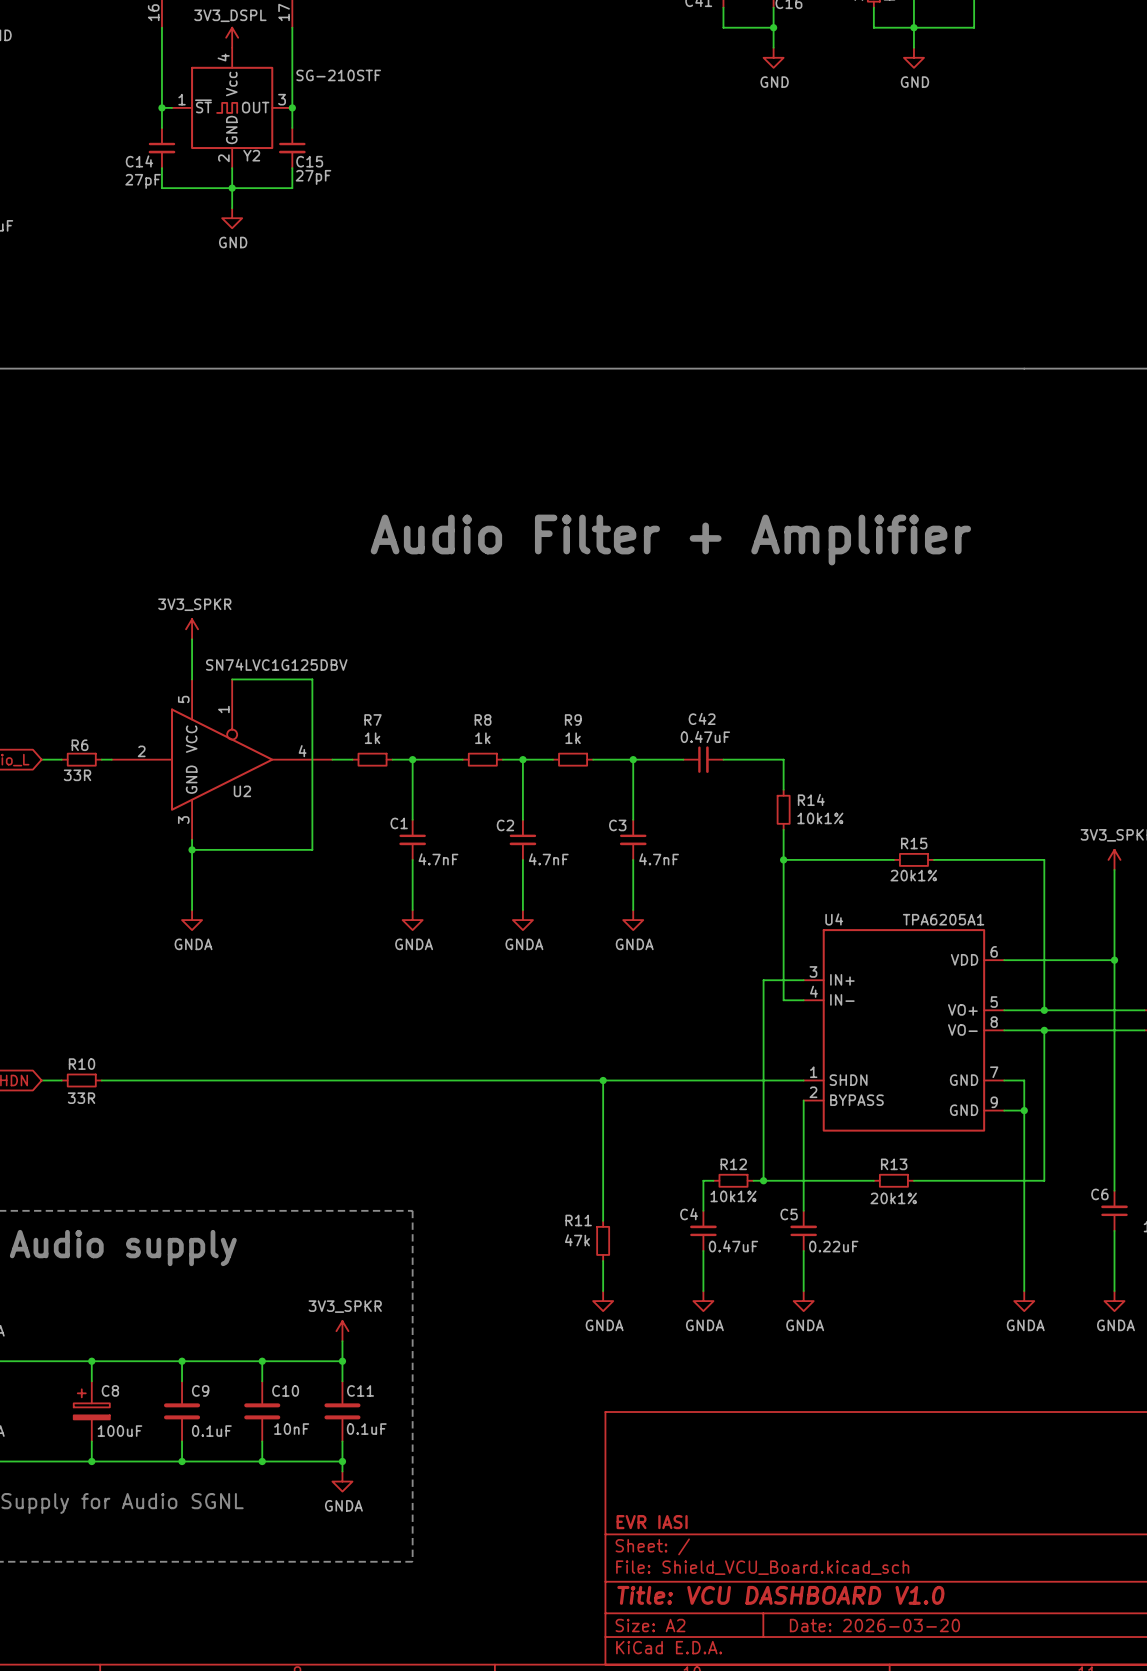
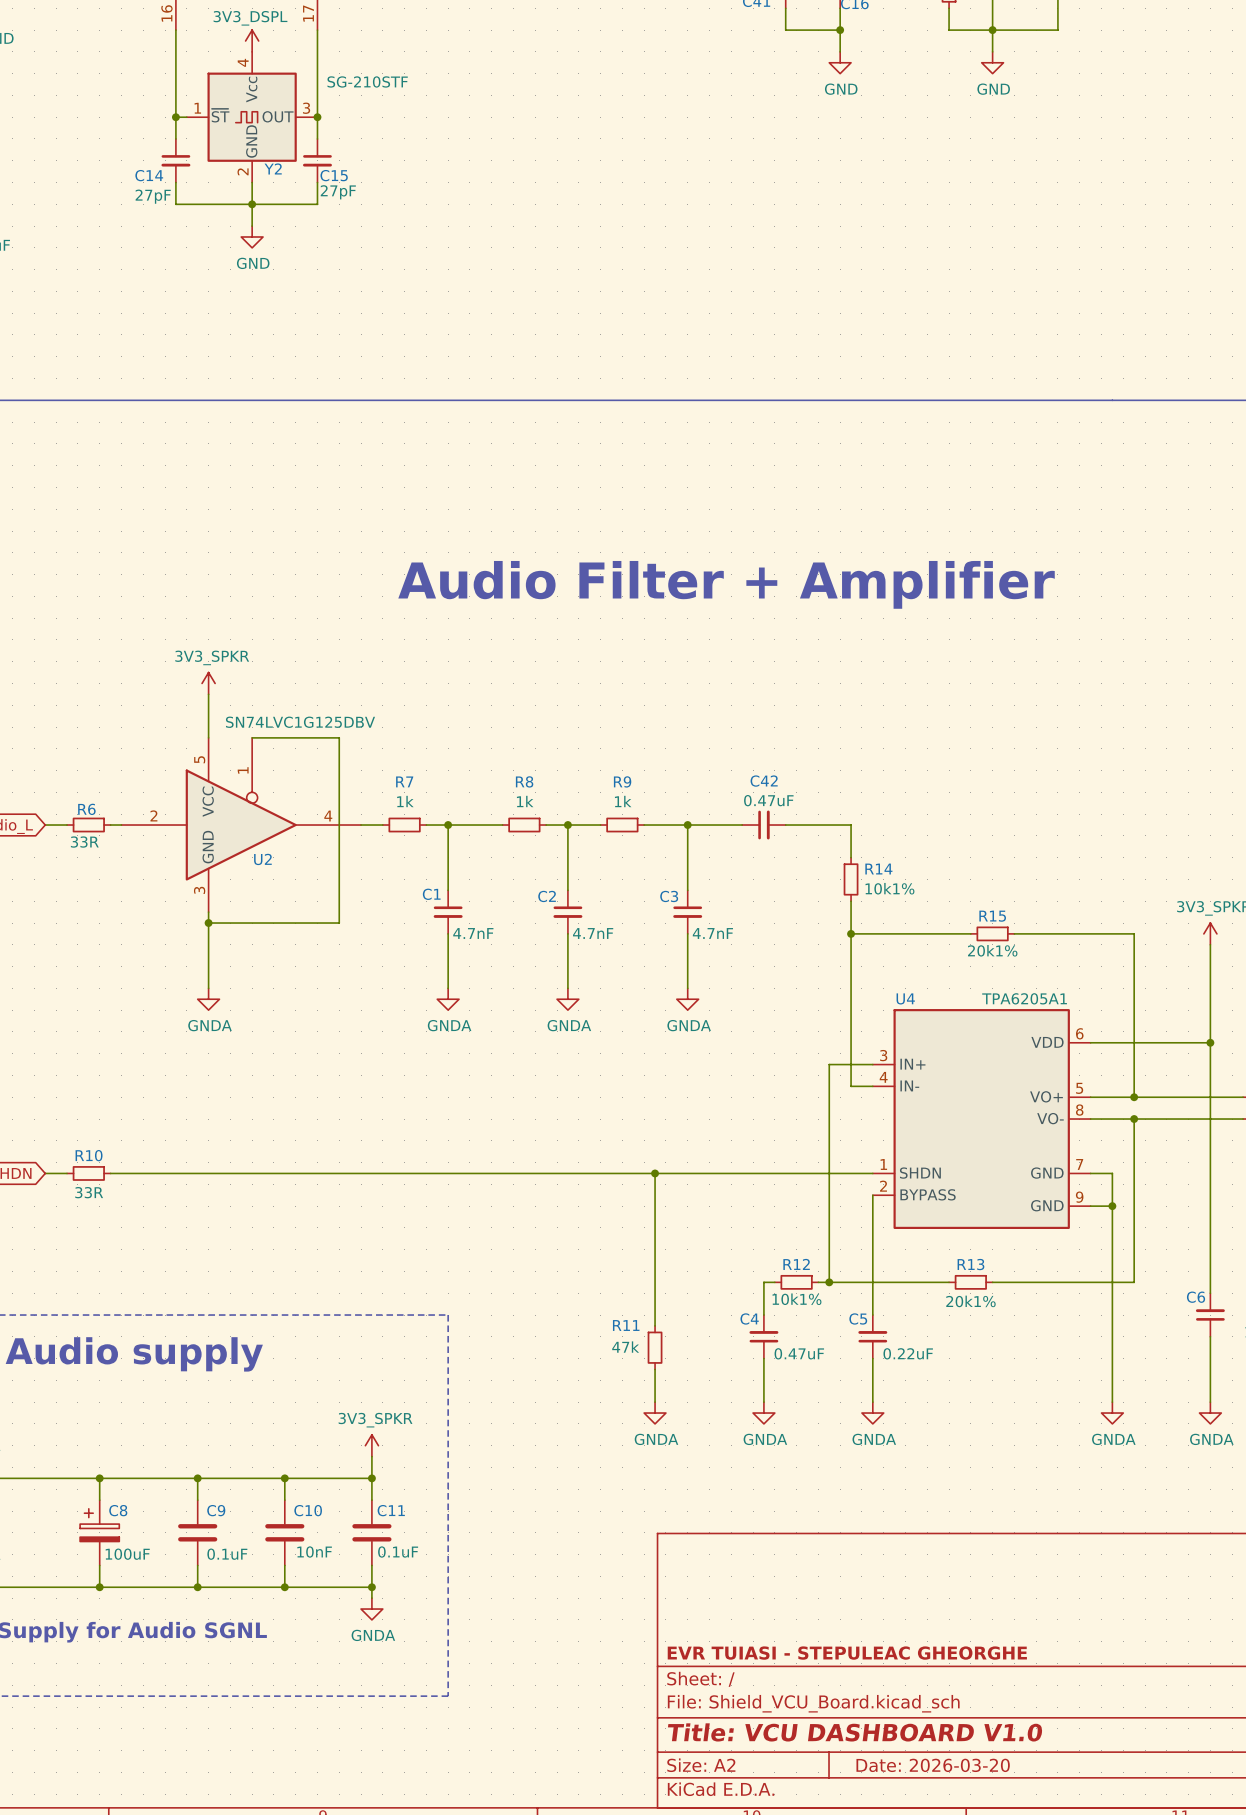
title block: EVR IASI (652, 1522) -> EVR TUIASI - STEPULEAC GHEORGHE (847, 1653)

